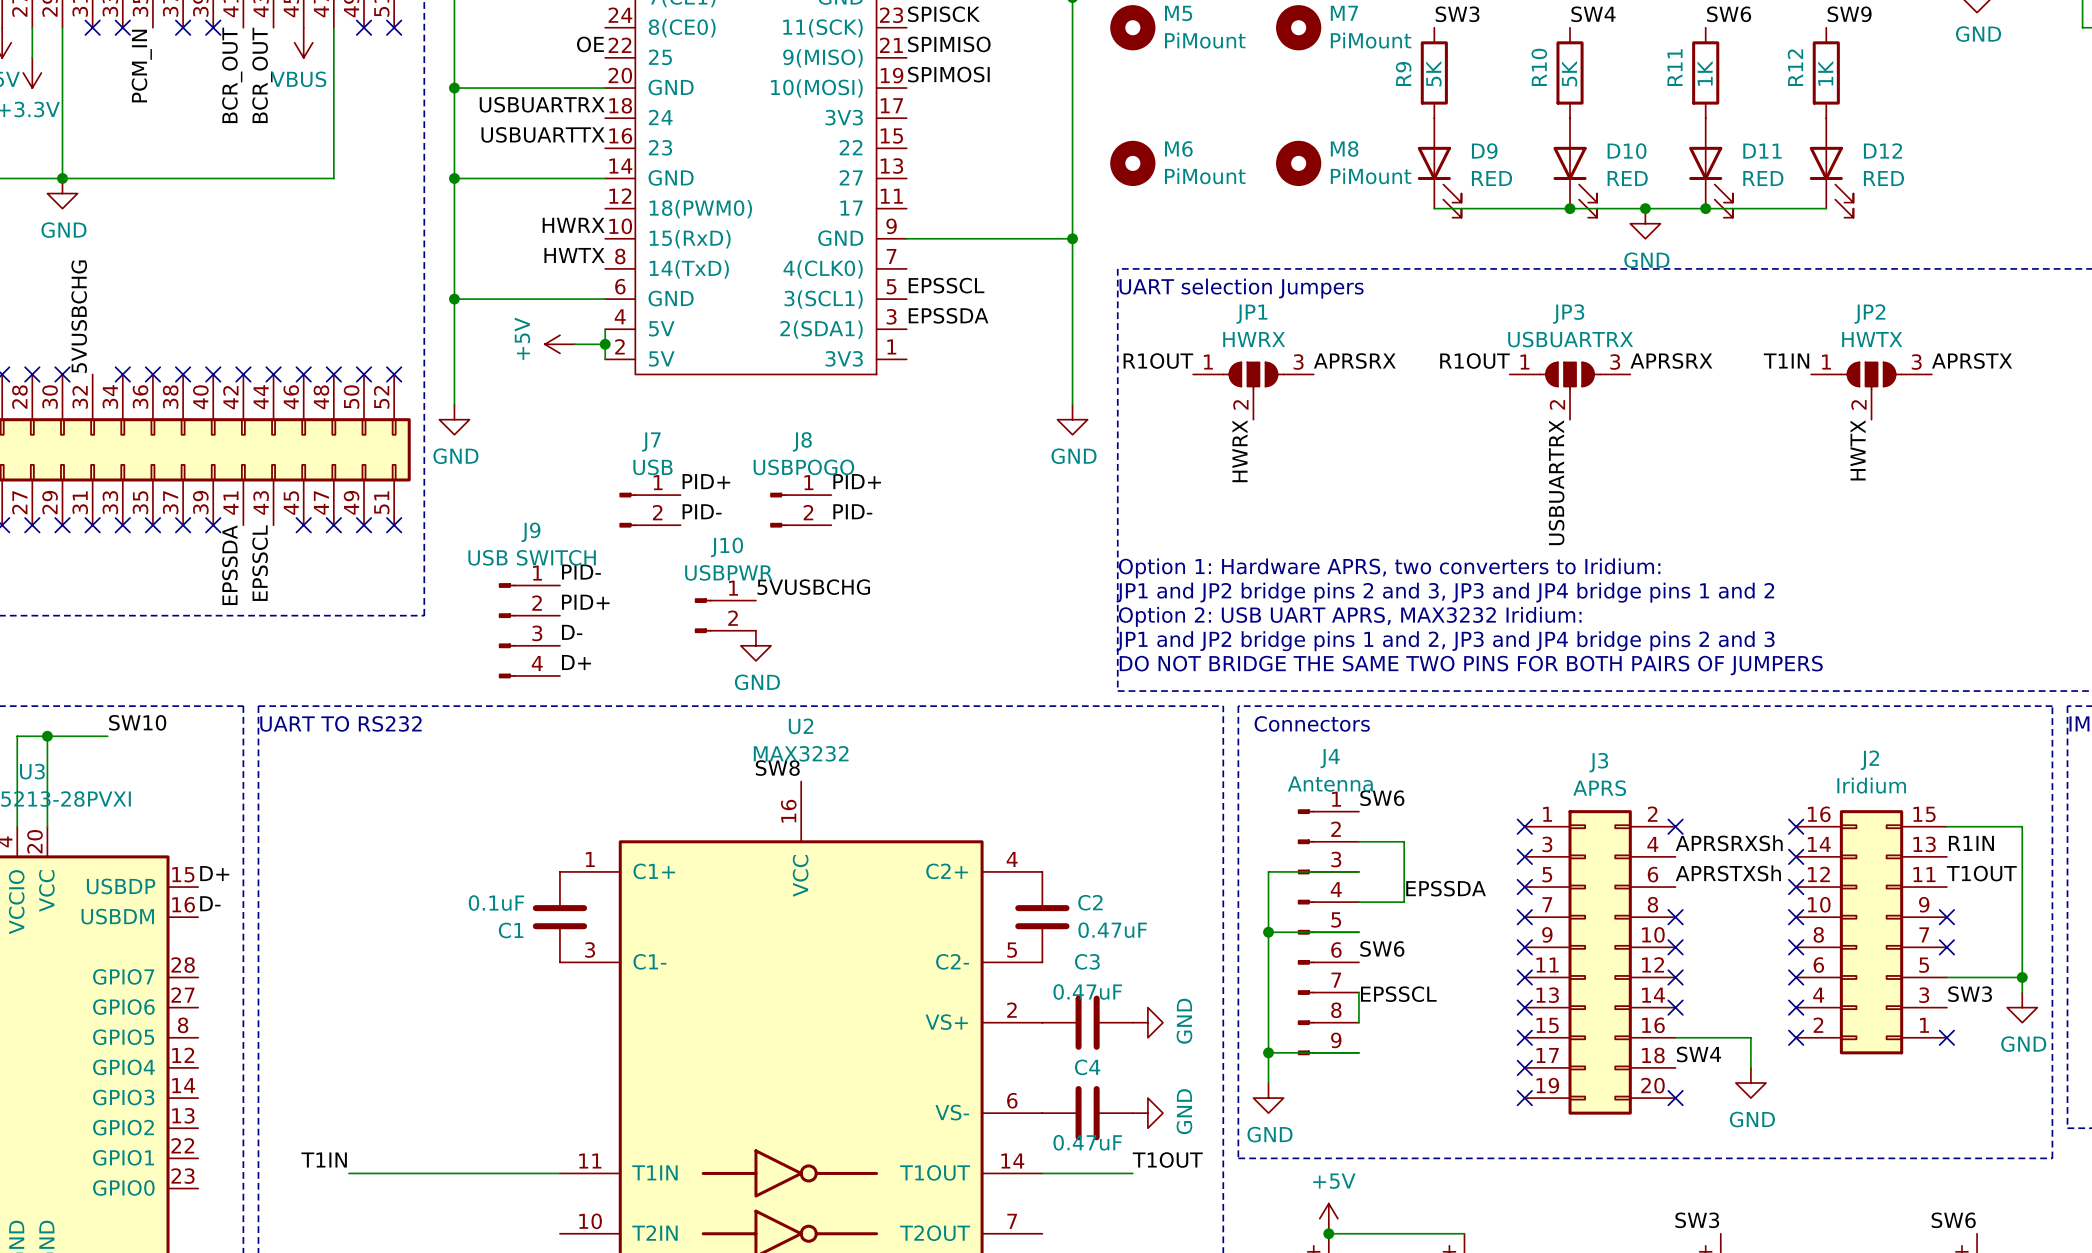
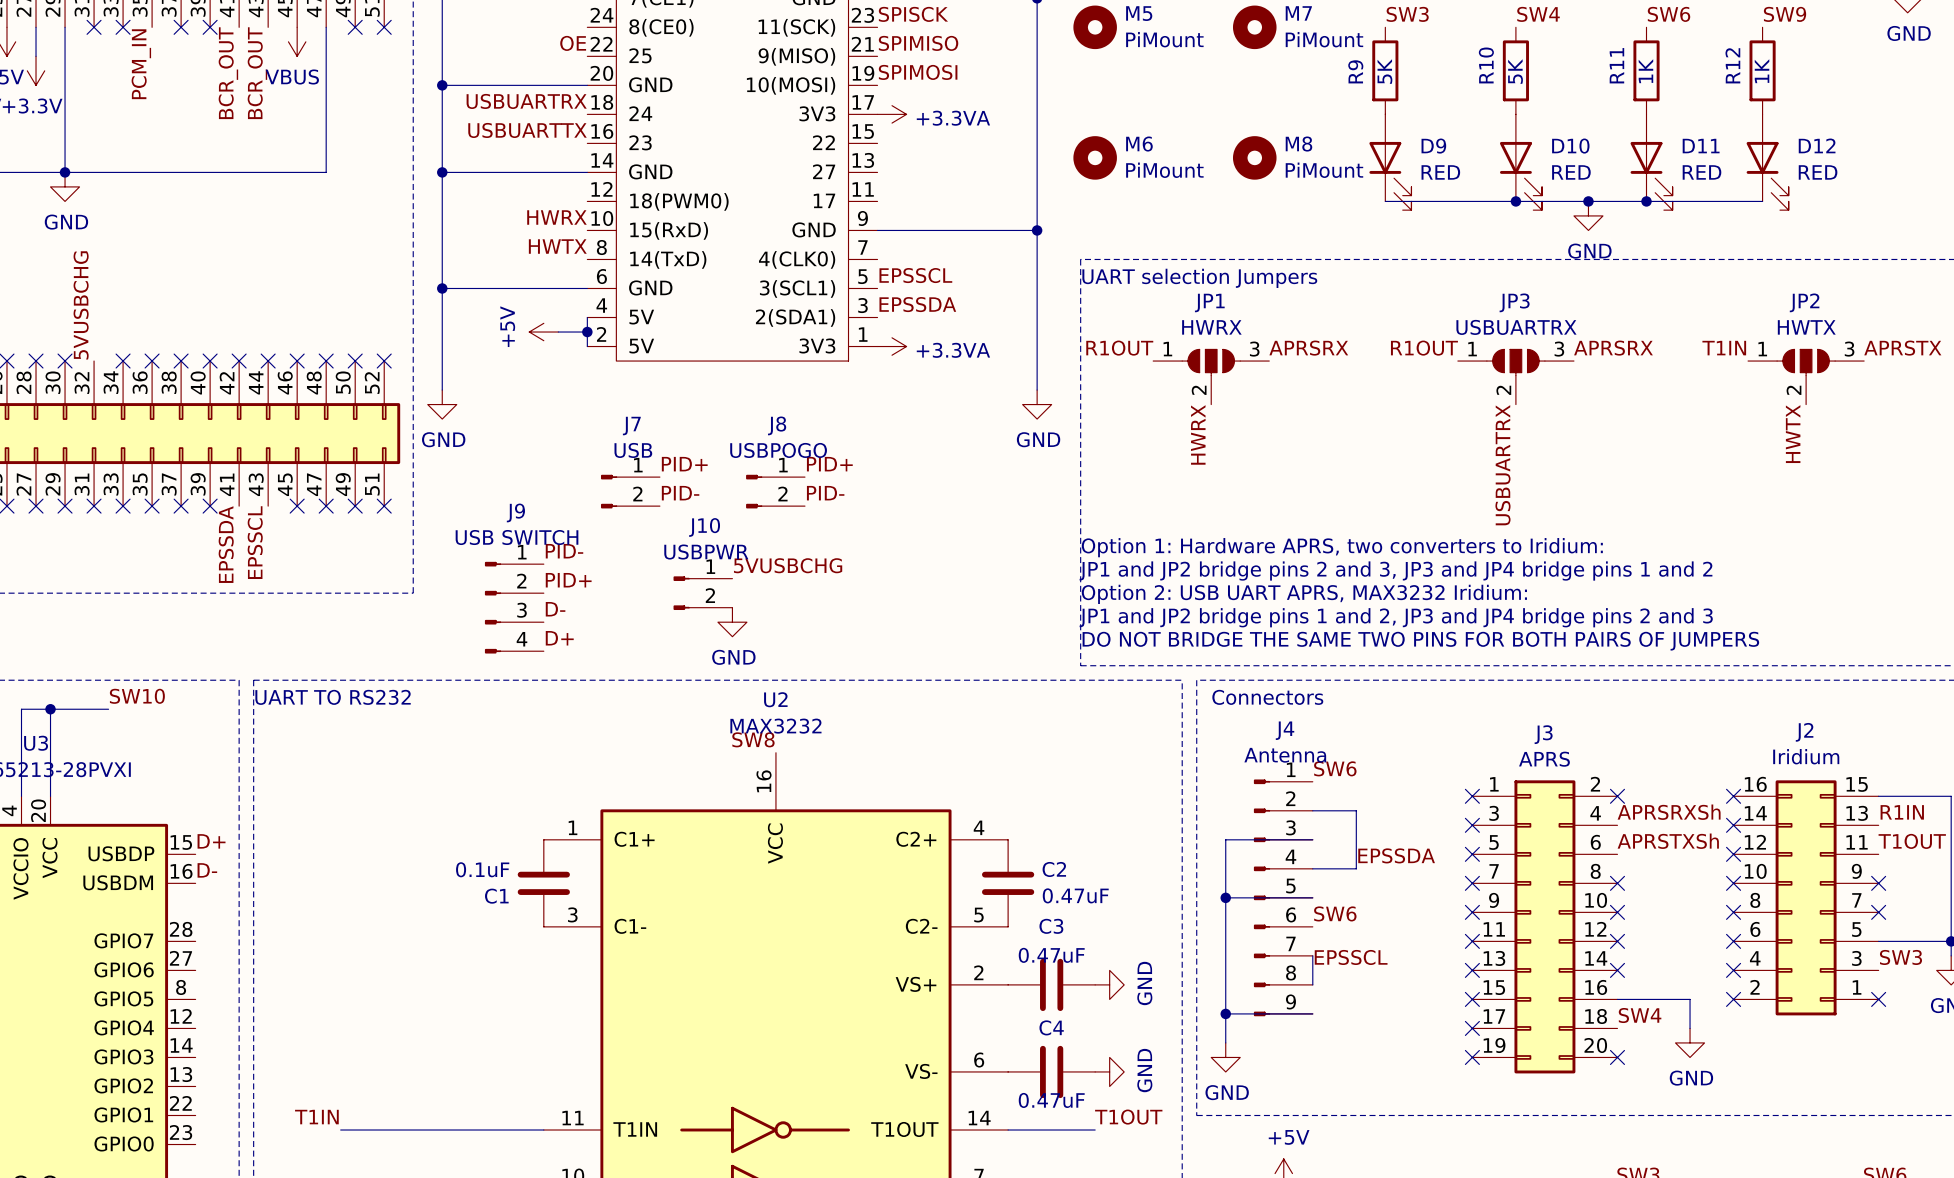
power symbol: none -> +3.3VA (892, 114)
power symbol: none -> +3.3VA (892, 346)

